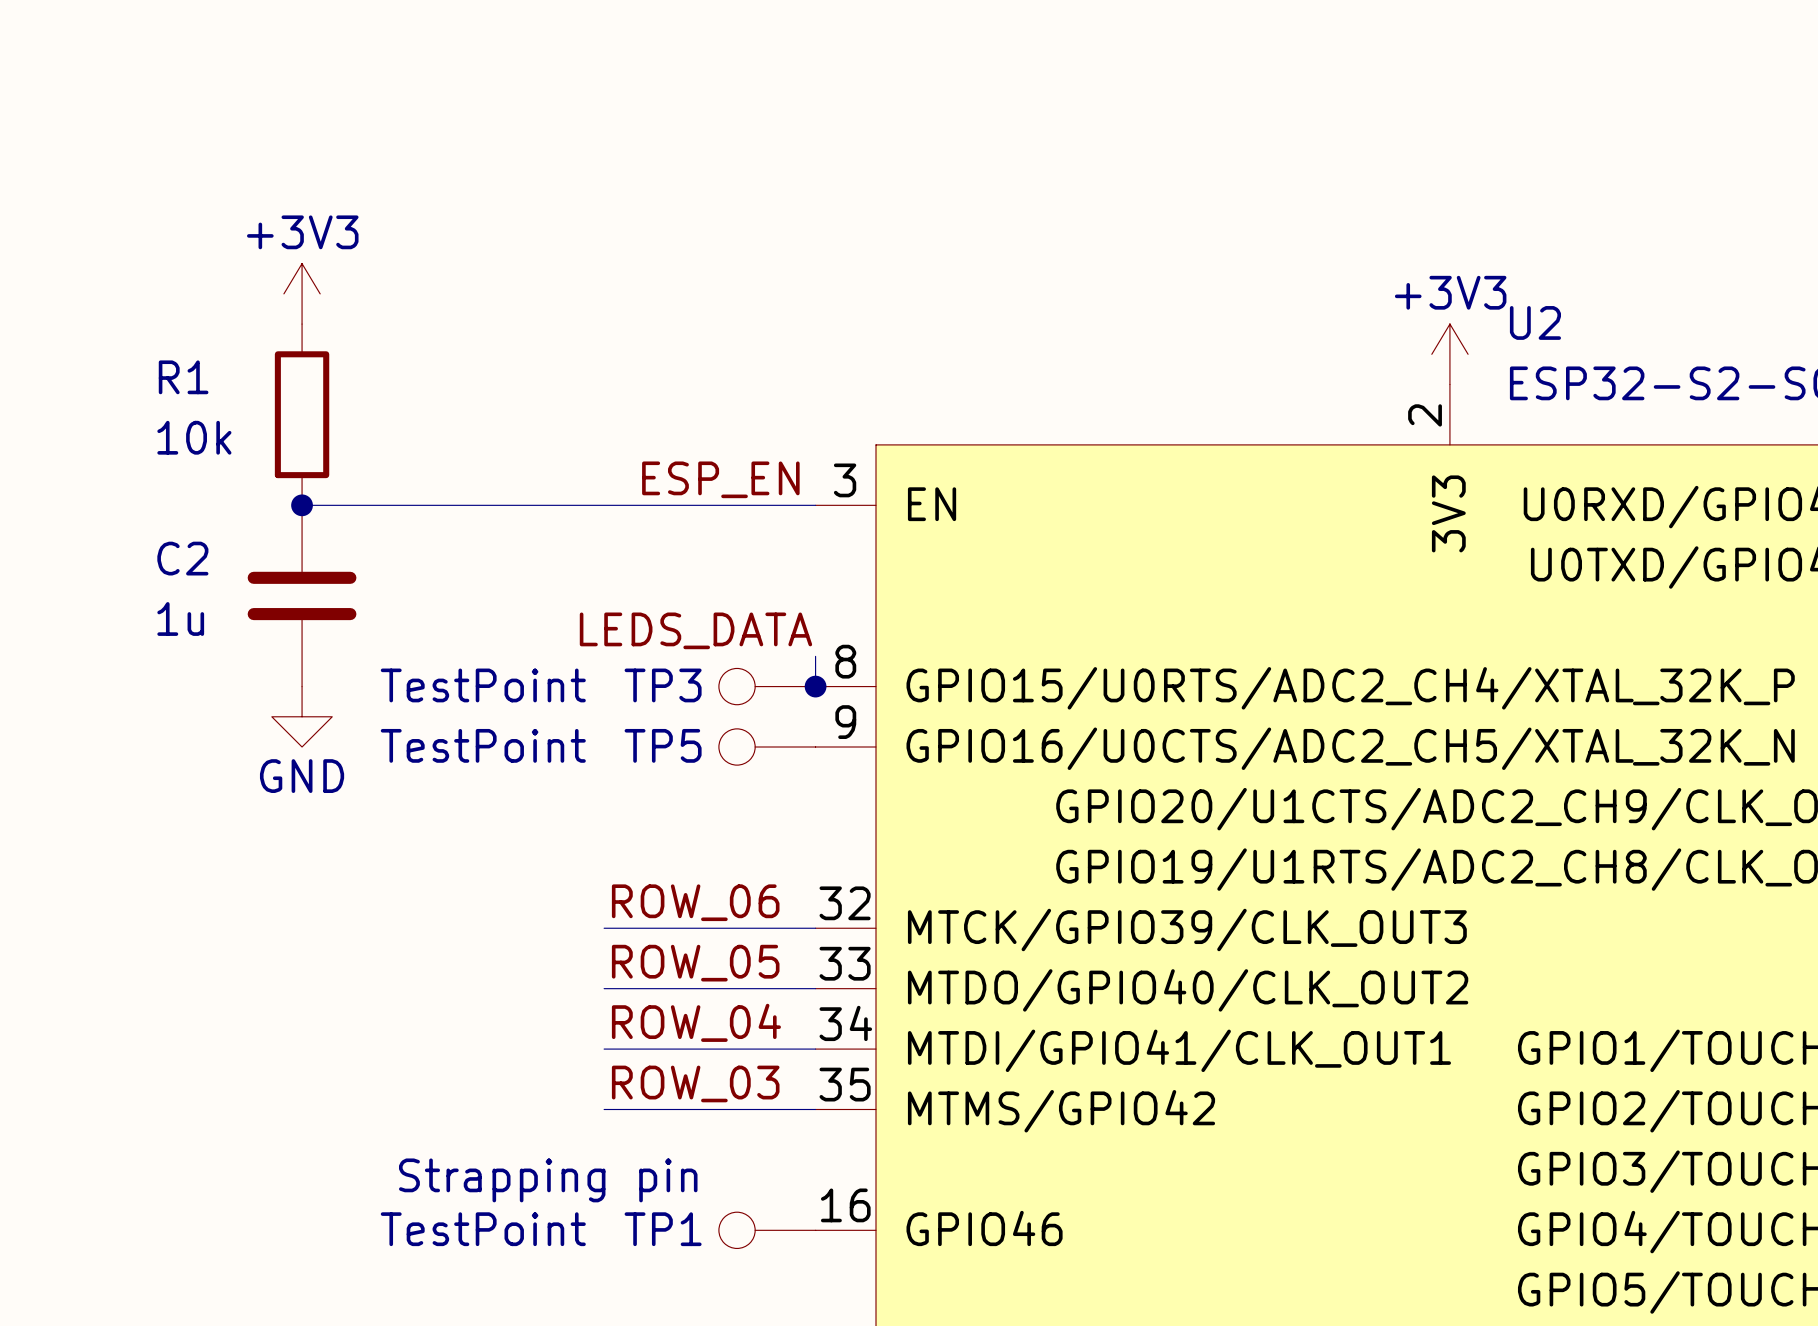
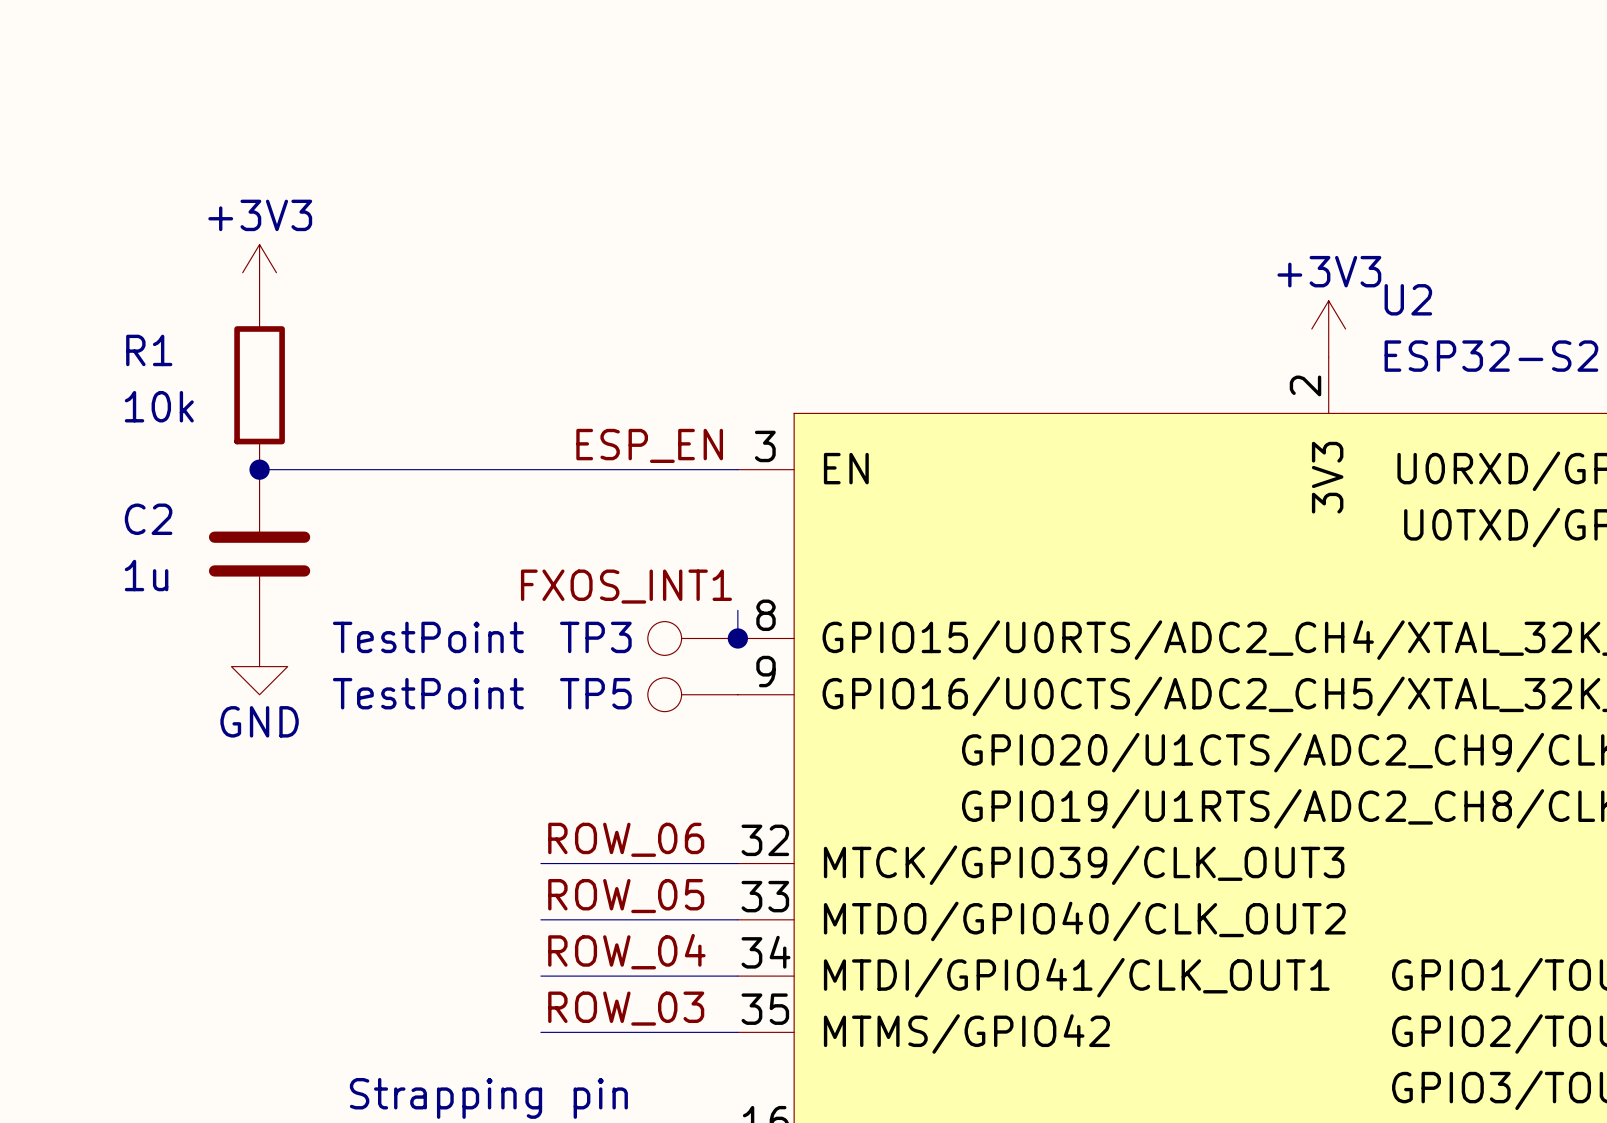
label: LEDS_DATA (695, 630) -> FXOS_INT1 (626, 586)

